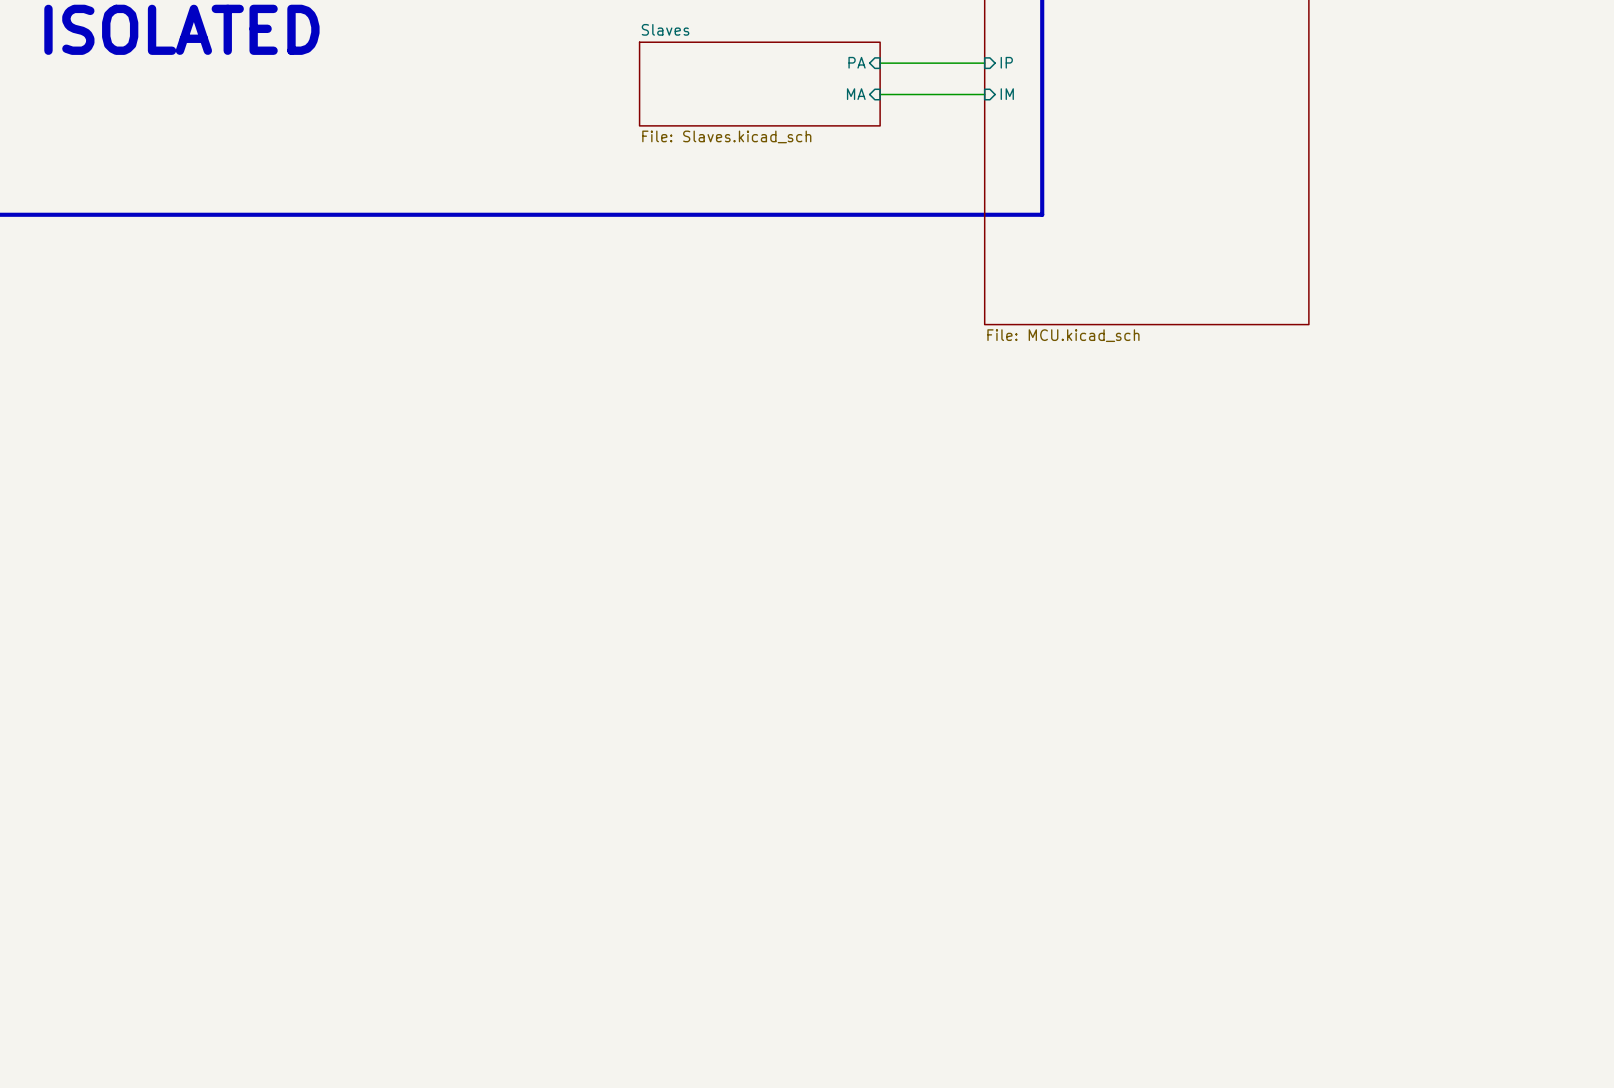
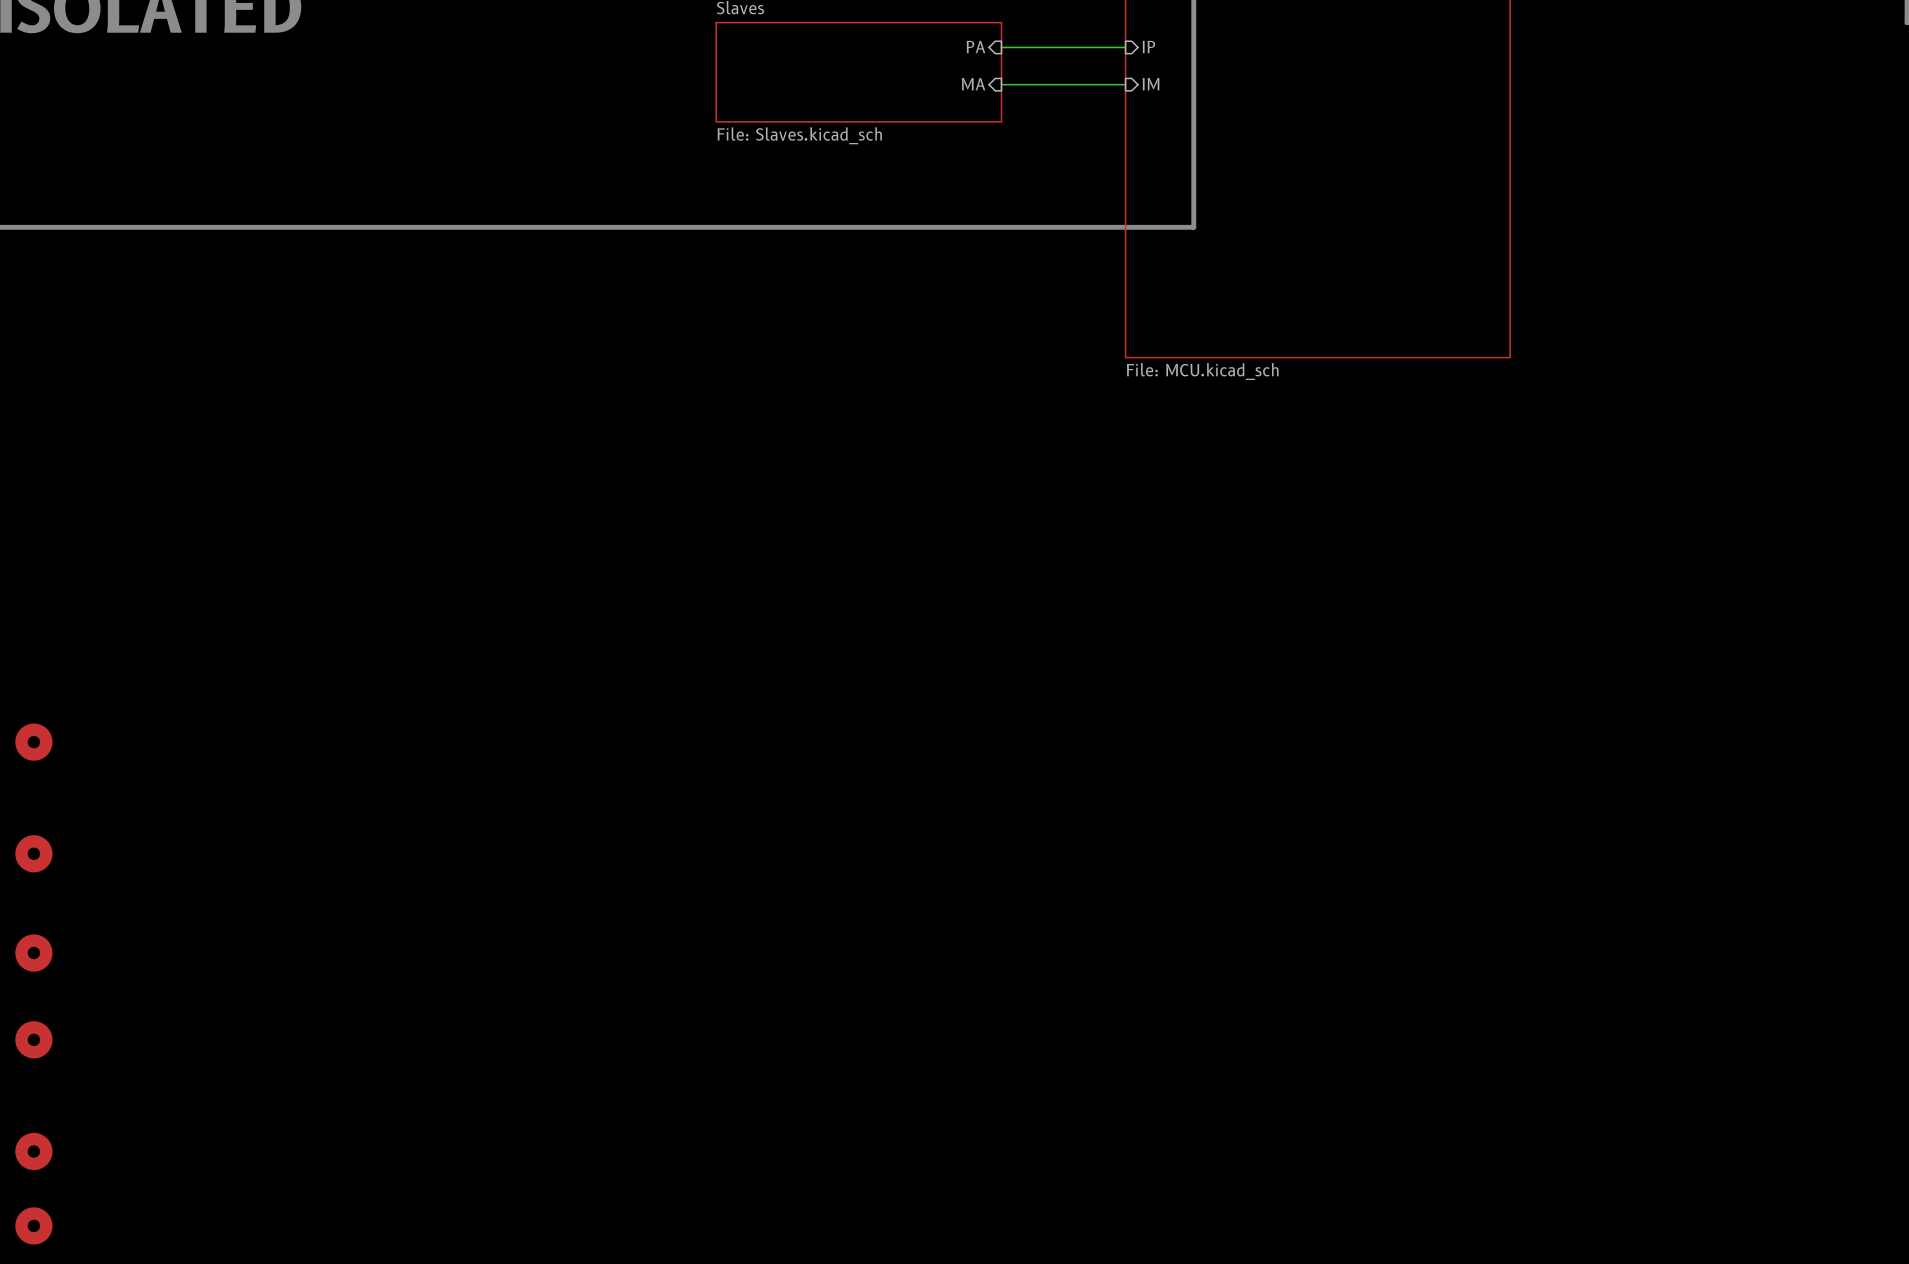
part: none -> (33, 742)
part: none -> (33, 853)
part: none -> (33, 953)
part: none -> (33, 1039)
part: none -> (33, 1151)
part: none -> (33, 1225)

